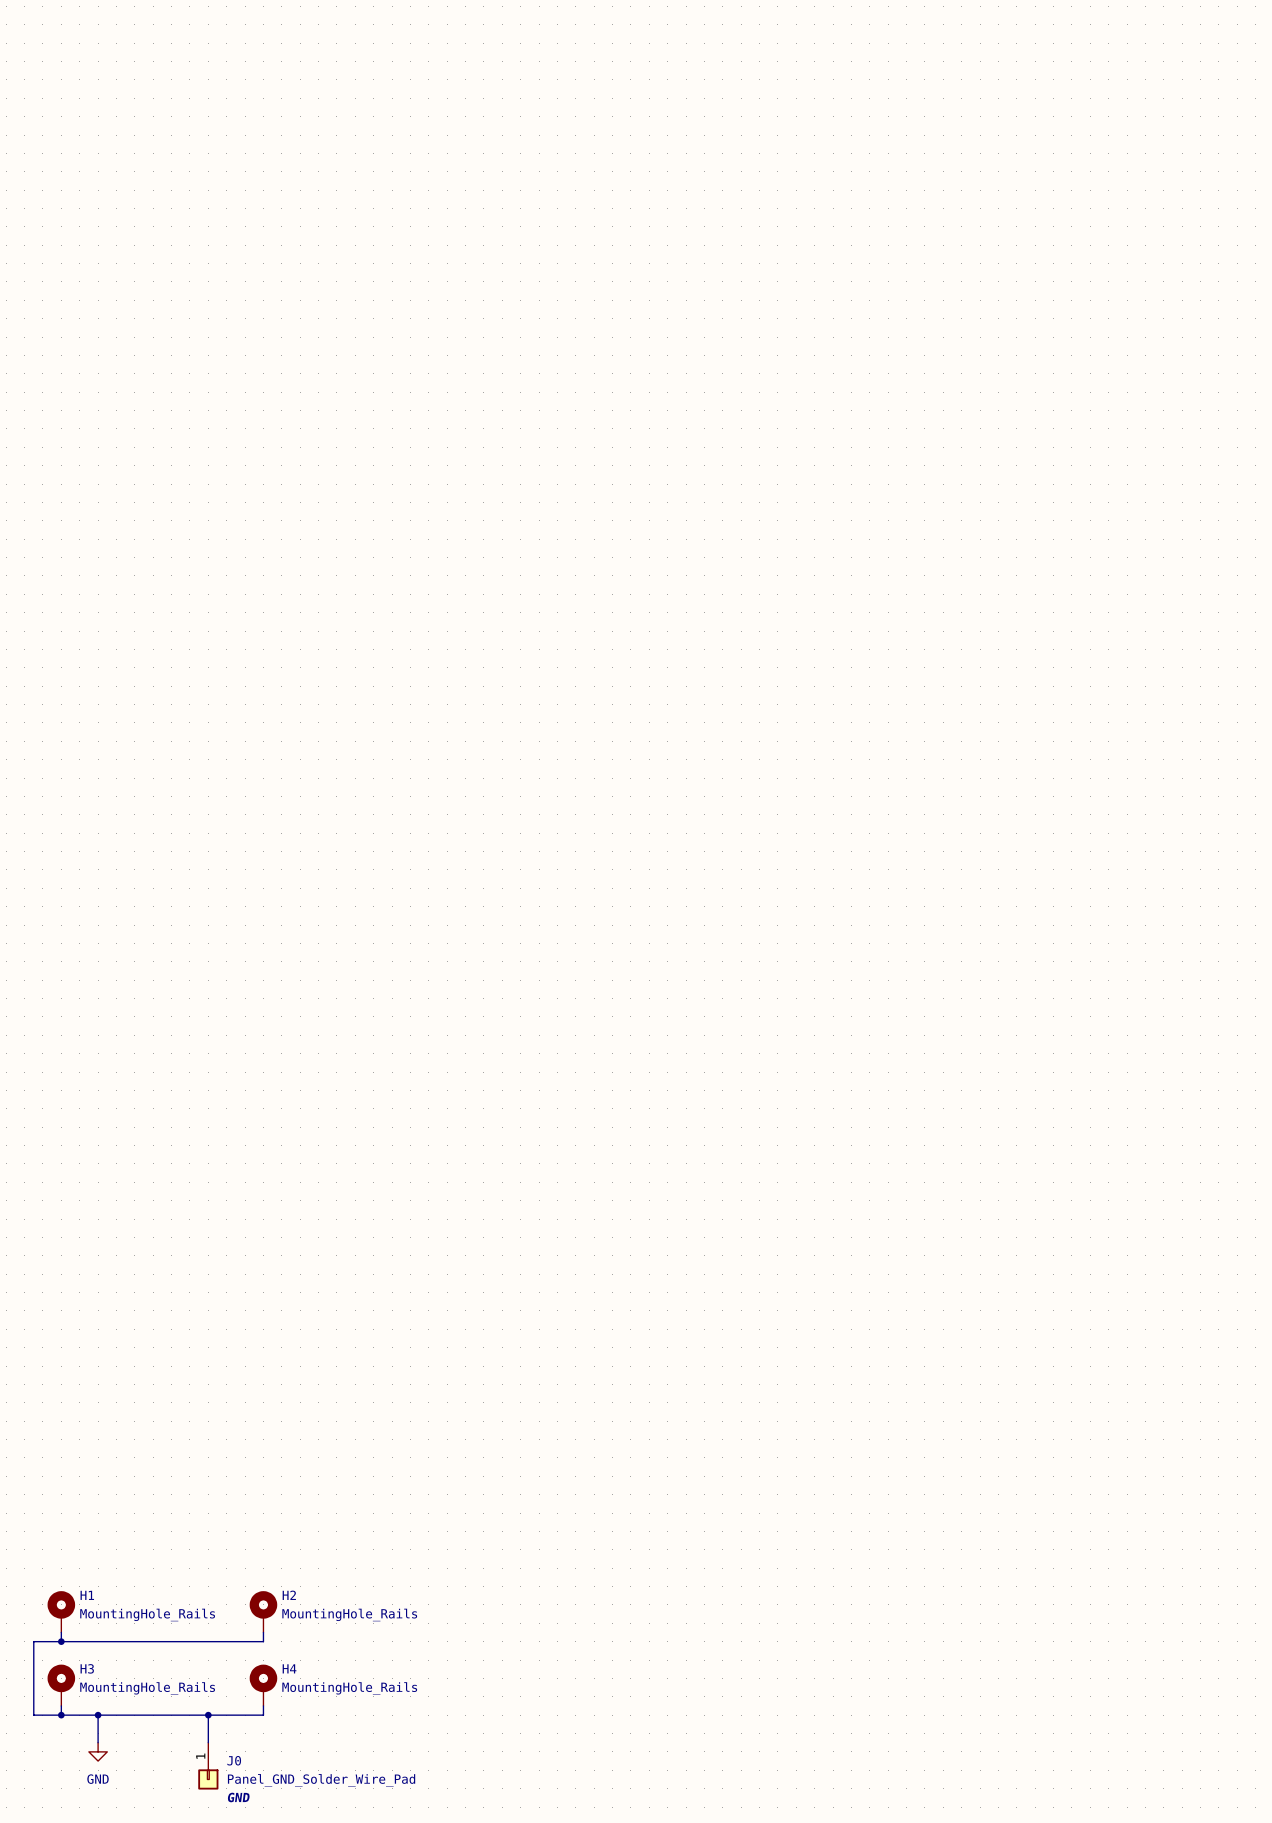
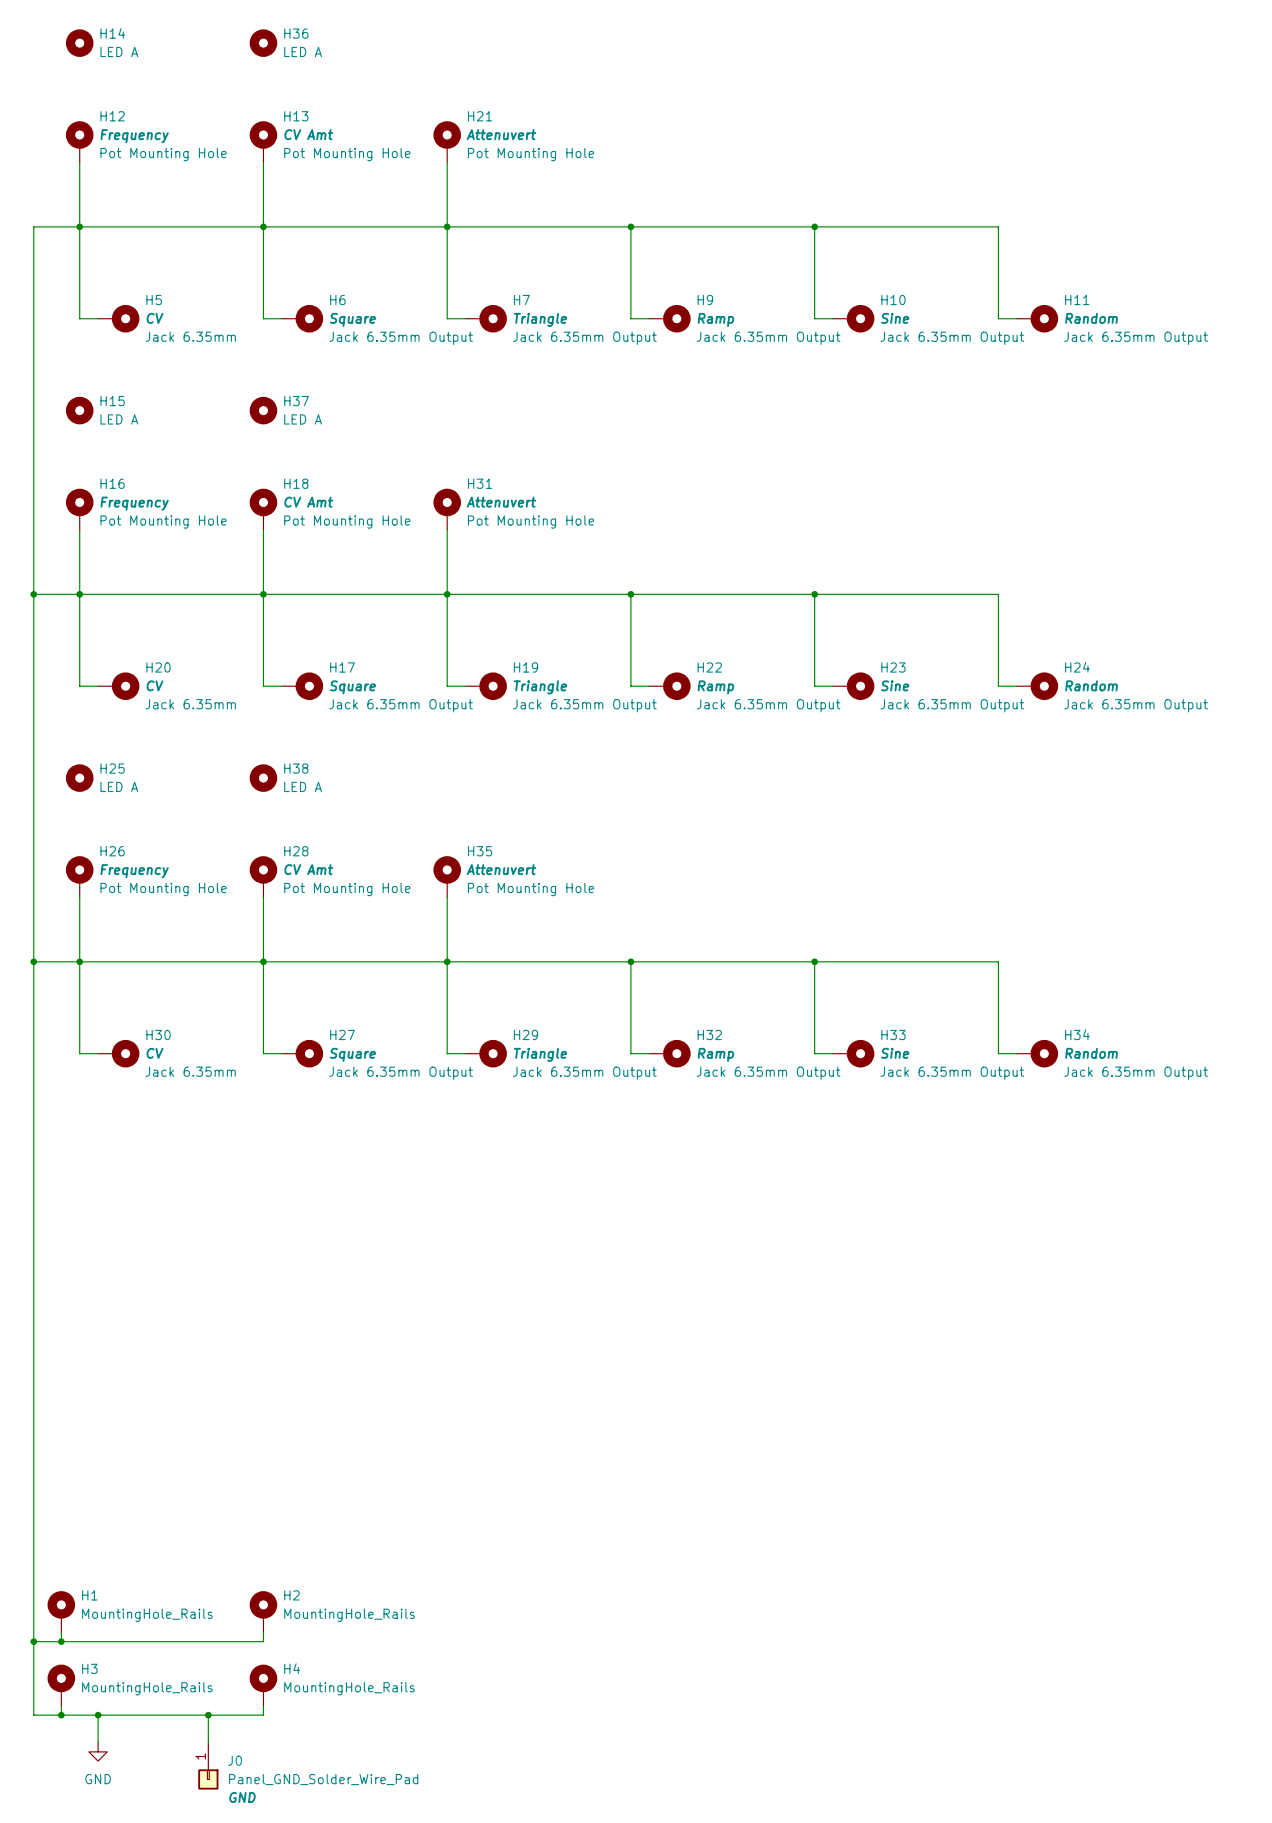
H14: none -> LED A (79, 43)
H36: none -> LED A (263, 43)
H12: none -> Frequency (79, 141)
H13: none -> CV Amt (263, 141)
H21: none -> Attenuvert (447, 141)
wire: none -> (79, 162) (79, 318) (98, 318)
wire: none -> (263, 162) (263, 318) (281, 318)
wire: none -> (447, 162) (447, 318) (465, 318)
junction: none -> (79, 226)
junction: none -> (263, 226)
junction: none -> (447, 226)
wire: none -> (630, 226) (630, 318) (649, 318)
junction: none -> (630, 226)
wire: none -> (814, 226) (814, 318) (833, 318)
junction: none -> (814, 226)
H5: none -> CV (118, 318)
H6: none -> Square (302, 318)
H7: none -> Triangle (486, 318)
H9: none -> Ramp (669, 318)
H10: none -> Sine (853, 318)
wire: none -> (1016, 318) (998, 318) (998, 226) (33, 226) (33, 1641)
H11: none -> Random (1037, 318)
H15: none -> LED A (79, 410)
H37: none -> LED A (263, 410)
H16: none -> Frequency (79, 509)
H18: none -> CV Amt (263, 509)
H31: none -> Attenuvert (447, 509)
wire: none -> (79, 530) (79, 686) (98, 686)
wire: none -> (263, 530) (263, 686) (281, 686)
wire: none -> (447, 530) (447, 686) (465, 686)
wire: none -> (33, 594) (998, 594) (998, 686) (1016, 686)
junction: none -> (33, 594)
junction: none -> (79, 594)
junction: none -> (263, 594)
junction: none -> (447, 594)
wire: none -> (630, 594) (630, 686) (649, 686)
junction: none -> (630, 594)
wire: none -> (814, 594) (814, 686) (833, 686)
junction: none -> (814, 594)
H20: none -> CV (118, 686)
H17: none -> Square (302, 686)
H19: none -> Triangle (486, 686)
H22: none -> Ramp (669, 686)
H23: none -> Sine (853, 686)
H24: none -> Random (1037, 686)
H25: none -> LED A (79, 778)
H38: none -> LED A (263, 778)
H26: none -> Frequency (79, 876)
H28: none -> CV Amt (263, 876)
H35: none -> Attenuvert (447, 876)
wire: none -> (79, 897) (79, 1053) (98, 1053)
wire: none -> (263, 897) (263, 1053) (281, 1053)
wire: none -> (447, 897) (447, 1053) (465, 1053)
wire: none -> (33, 961) (998, 961) (998, 1053) (1016, 1053)
junction: none -> (33, 961)
junction: none -> (79, 961)
junction: none -> (263, 961)
junction: none -> (447, 961)
wire: none -> (630, 961) (630, 1053) (649, 1053)
junction: none -> (630, 961)
wire: none -> (814, 961) (814, 1053) (833, 1053)
junction: none -> (814, 961)
H30: none -> CV (118, 1053)
H27: none -> Square (302, 1053)
H29: none -> Triangle (486, 1053)
H32: none -> Ramp (669, 1053)
H33: none -> Sine (853, 1053)
H34: none -> Random (1037, 1053)
junction: none -> (33, 1641)

